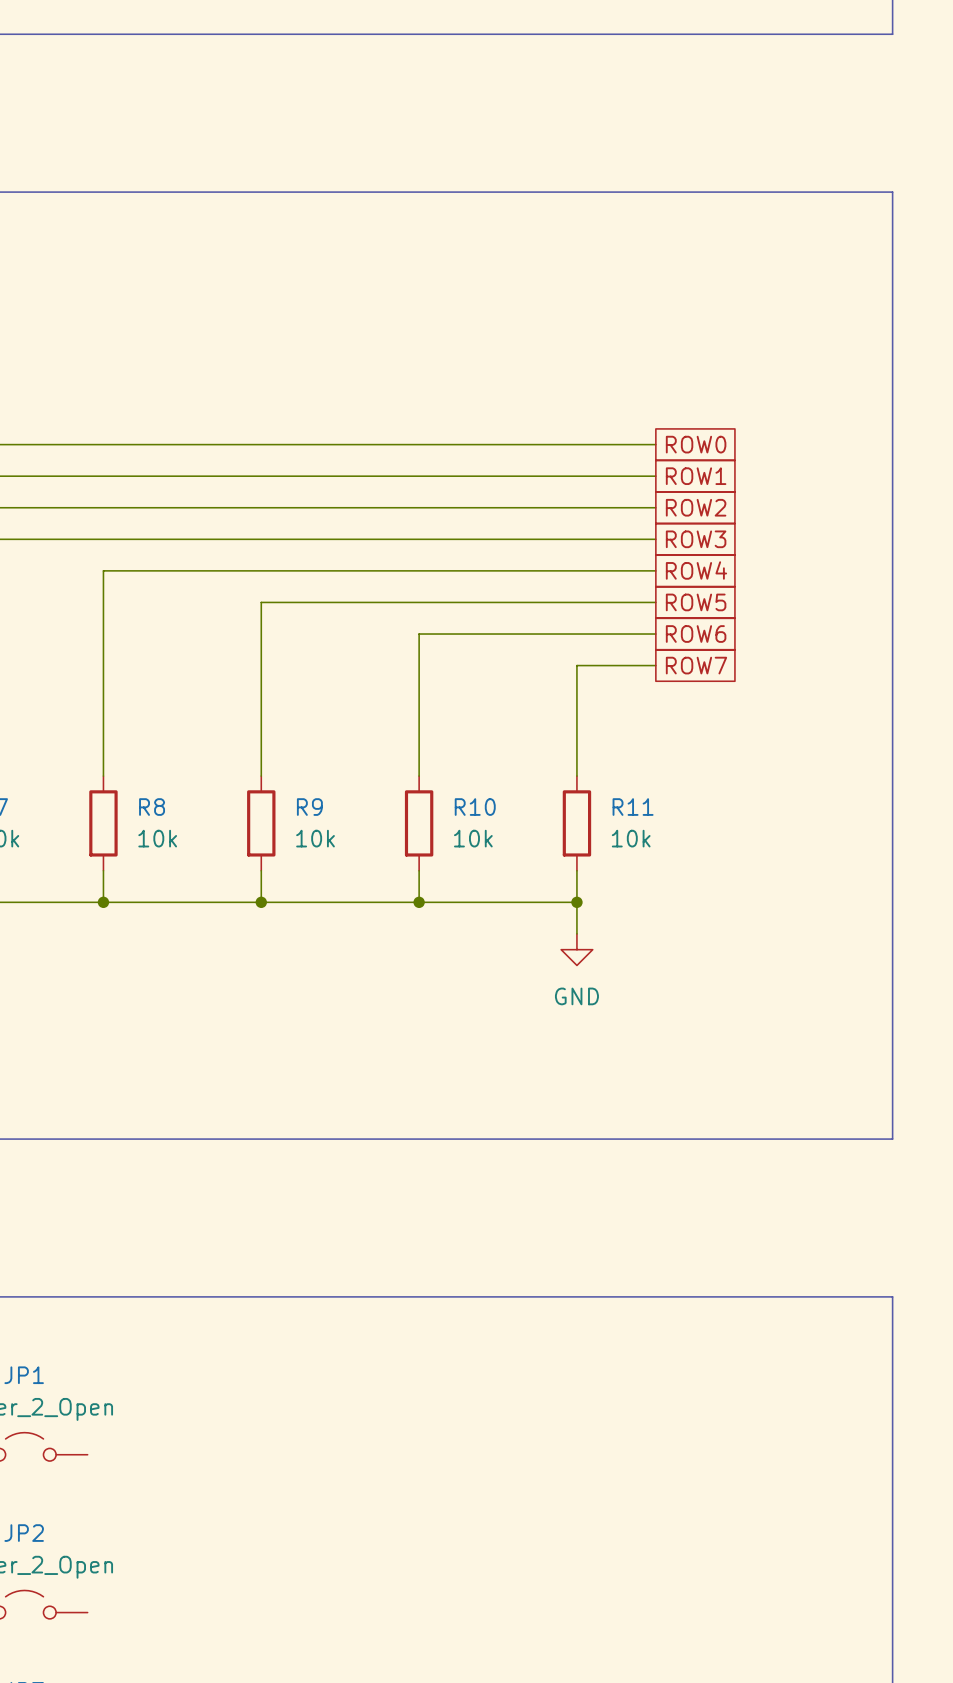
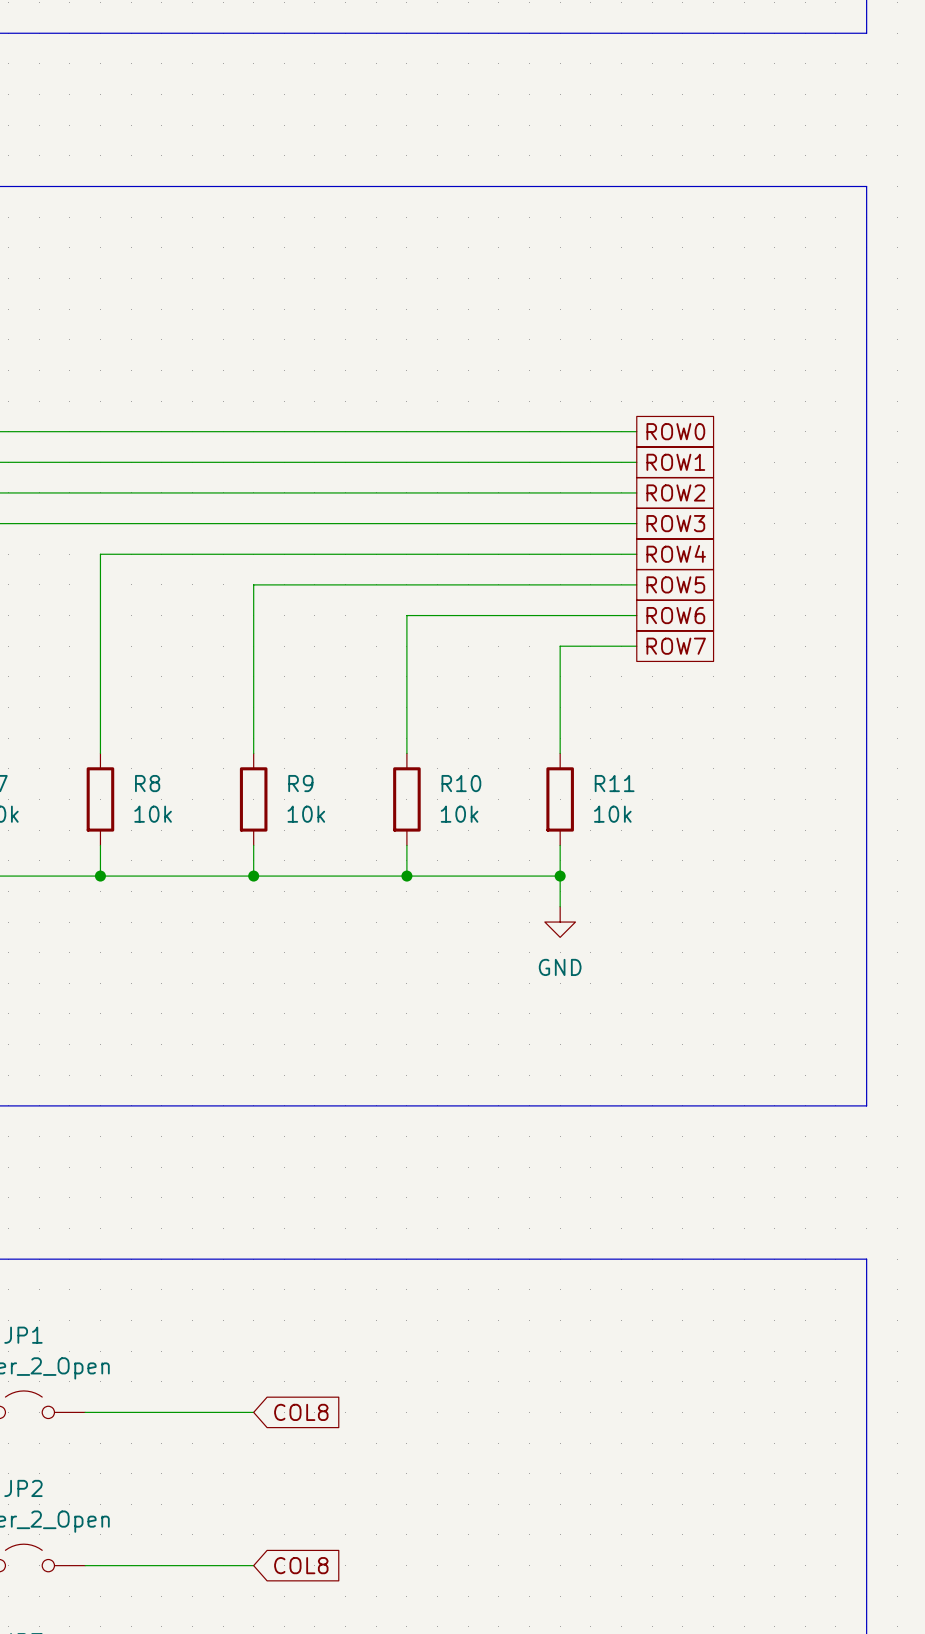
wire: none -> (85, 1412) (253, 1412)
global label: none -> COL8 (301, 1412)
wire: none -> (85, 1565) (253, 1565)
global label: none -> COL8 (301, 1565)

